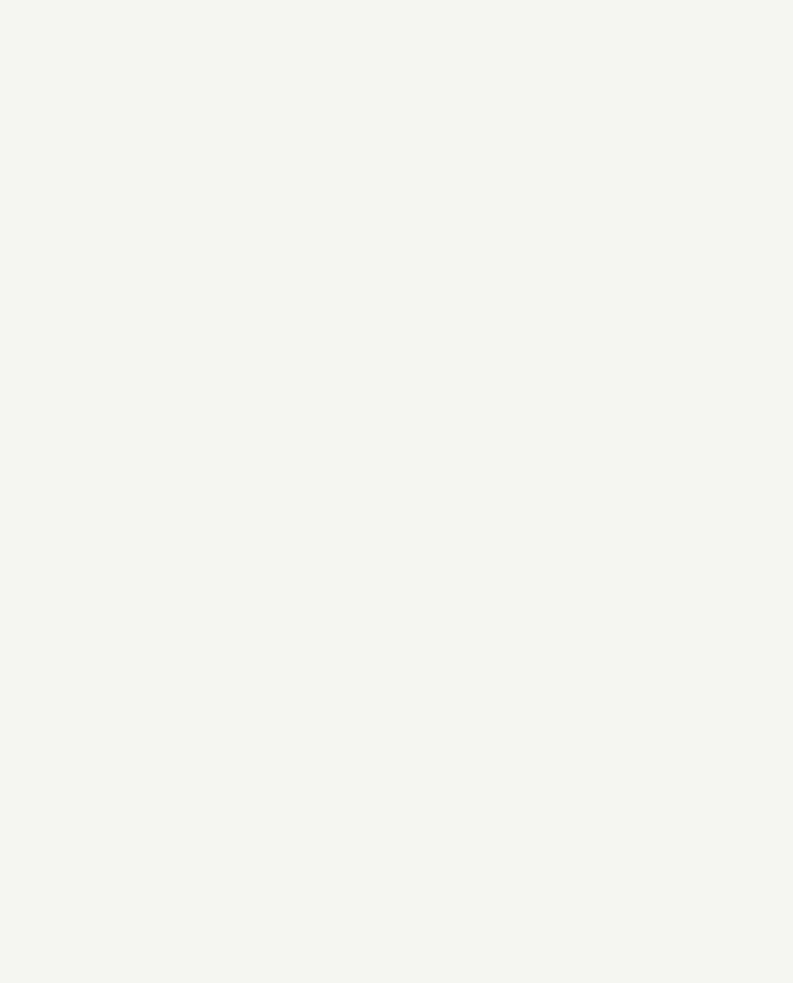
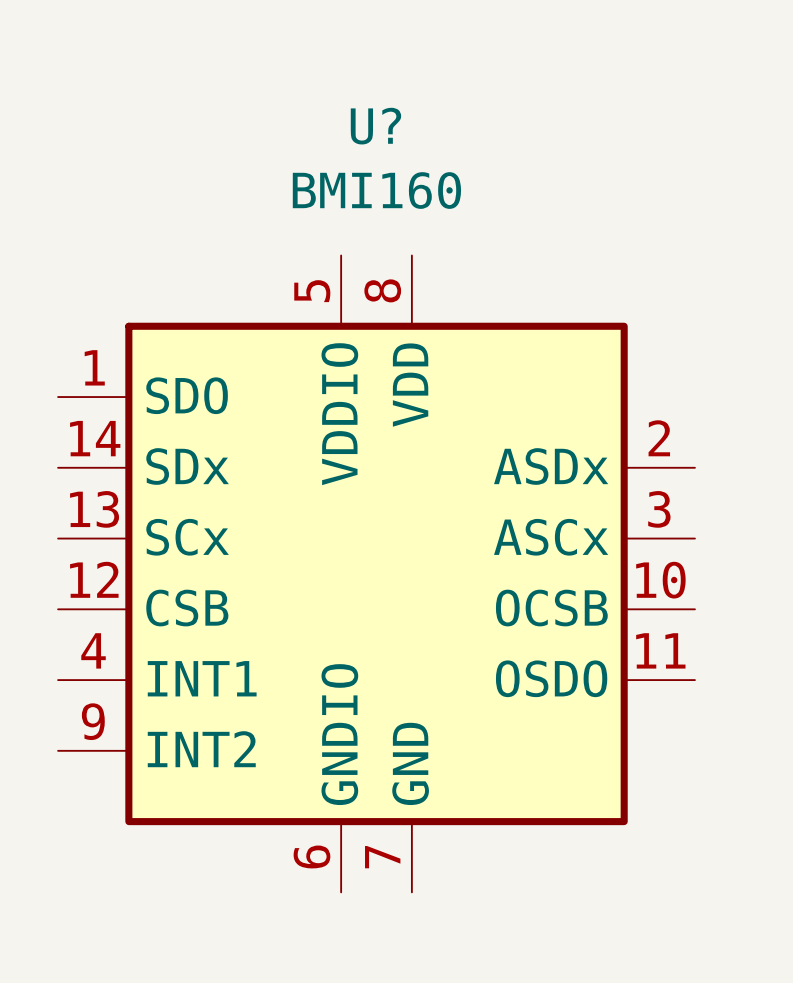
U?: none -> BMI160 (376, 573)

